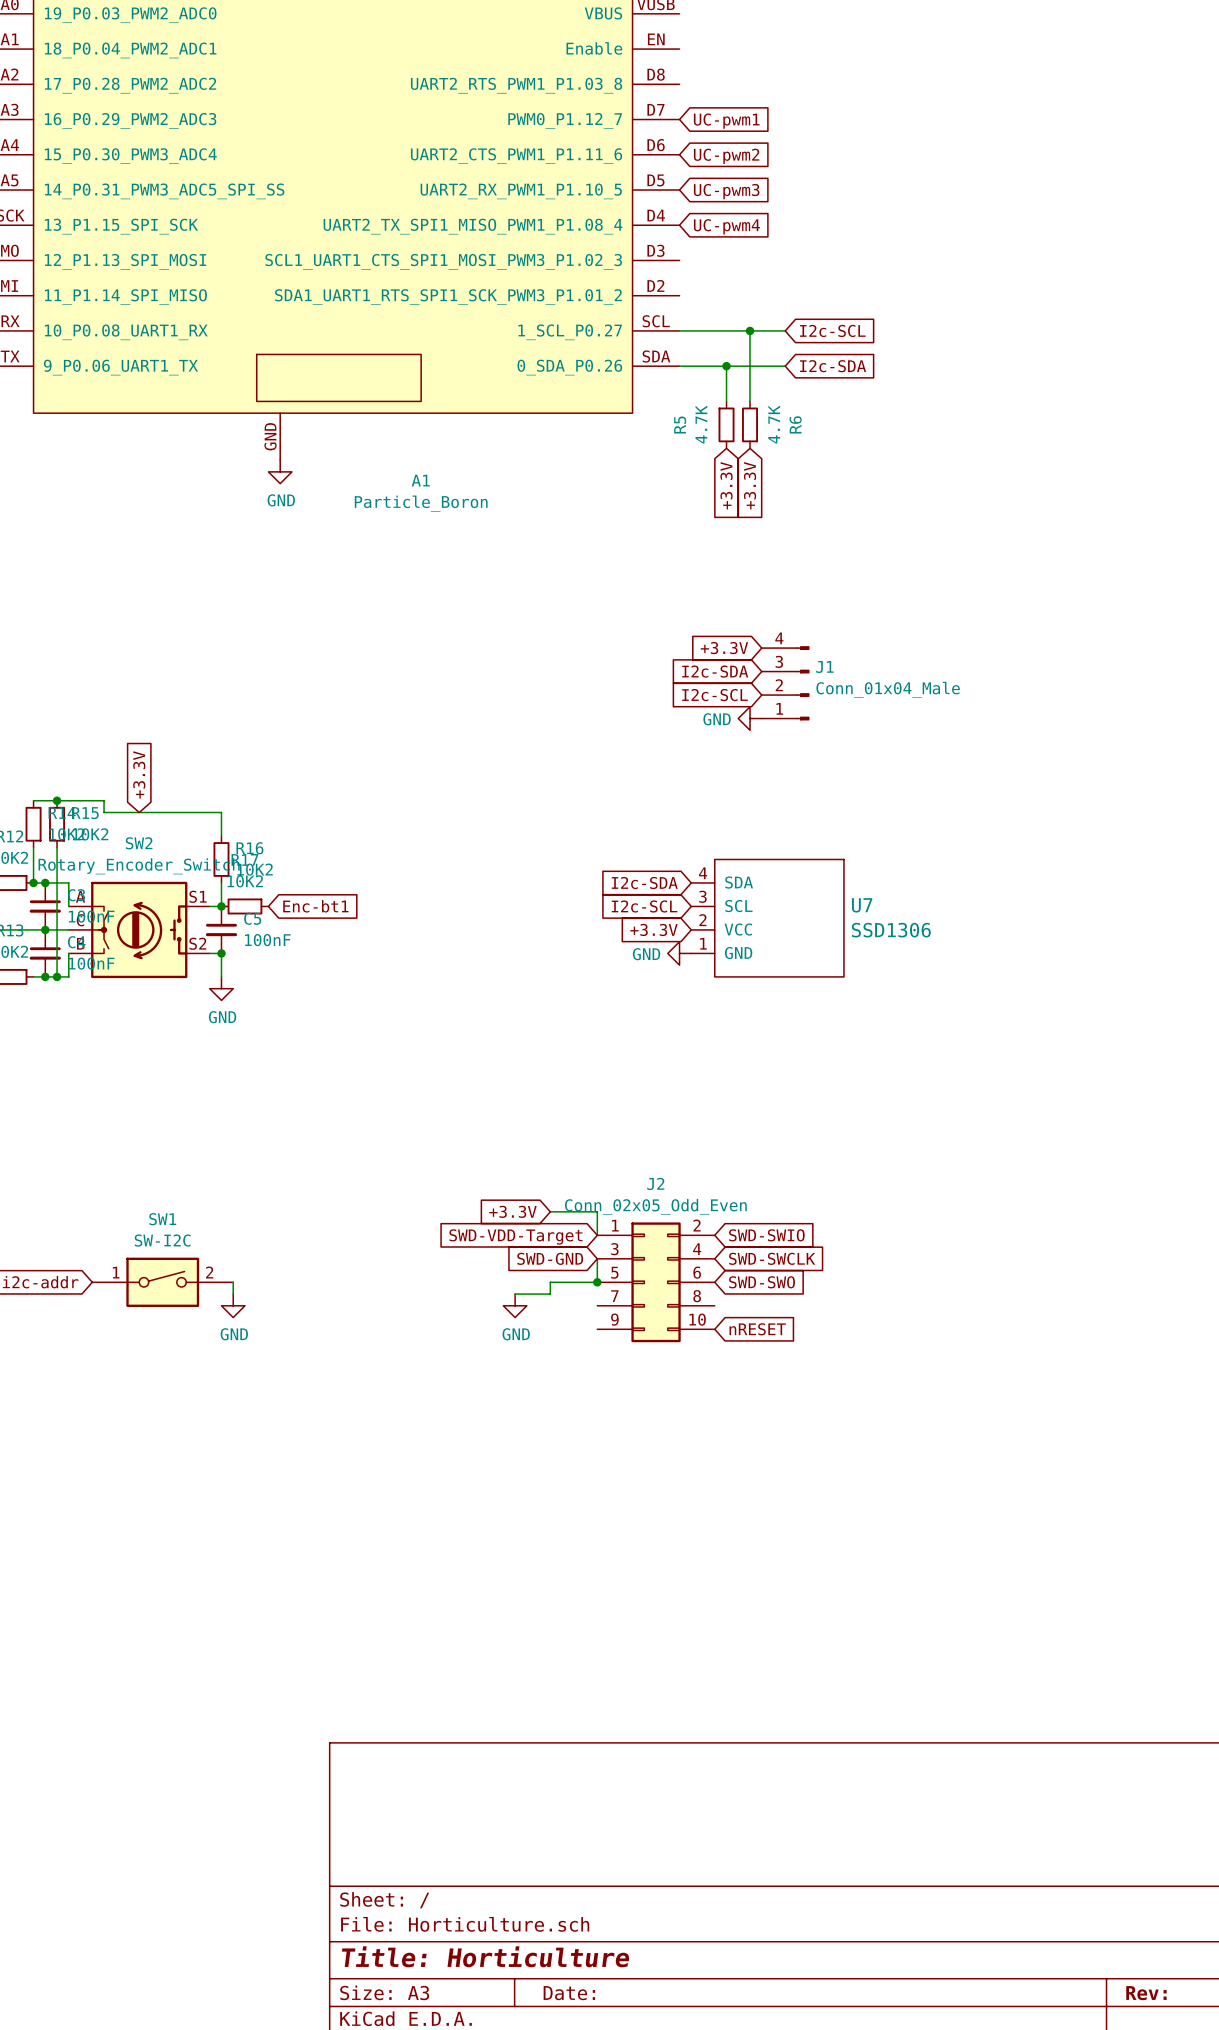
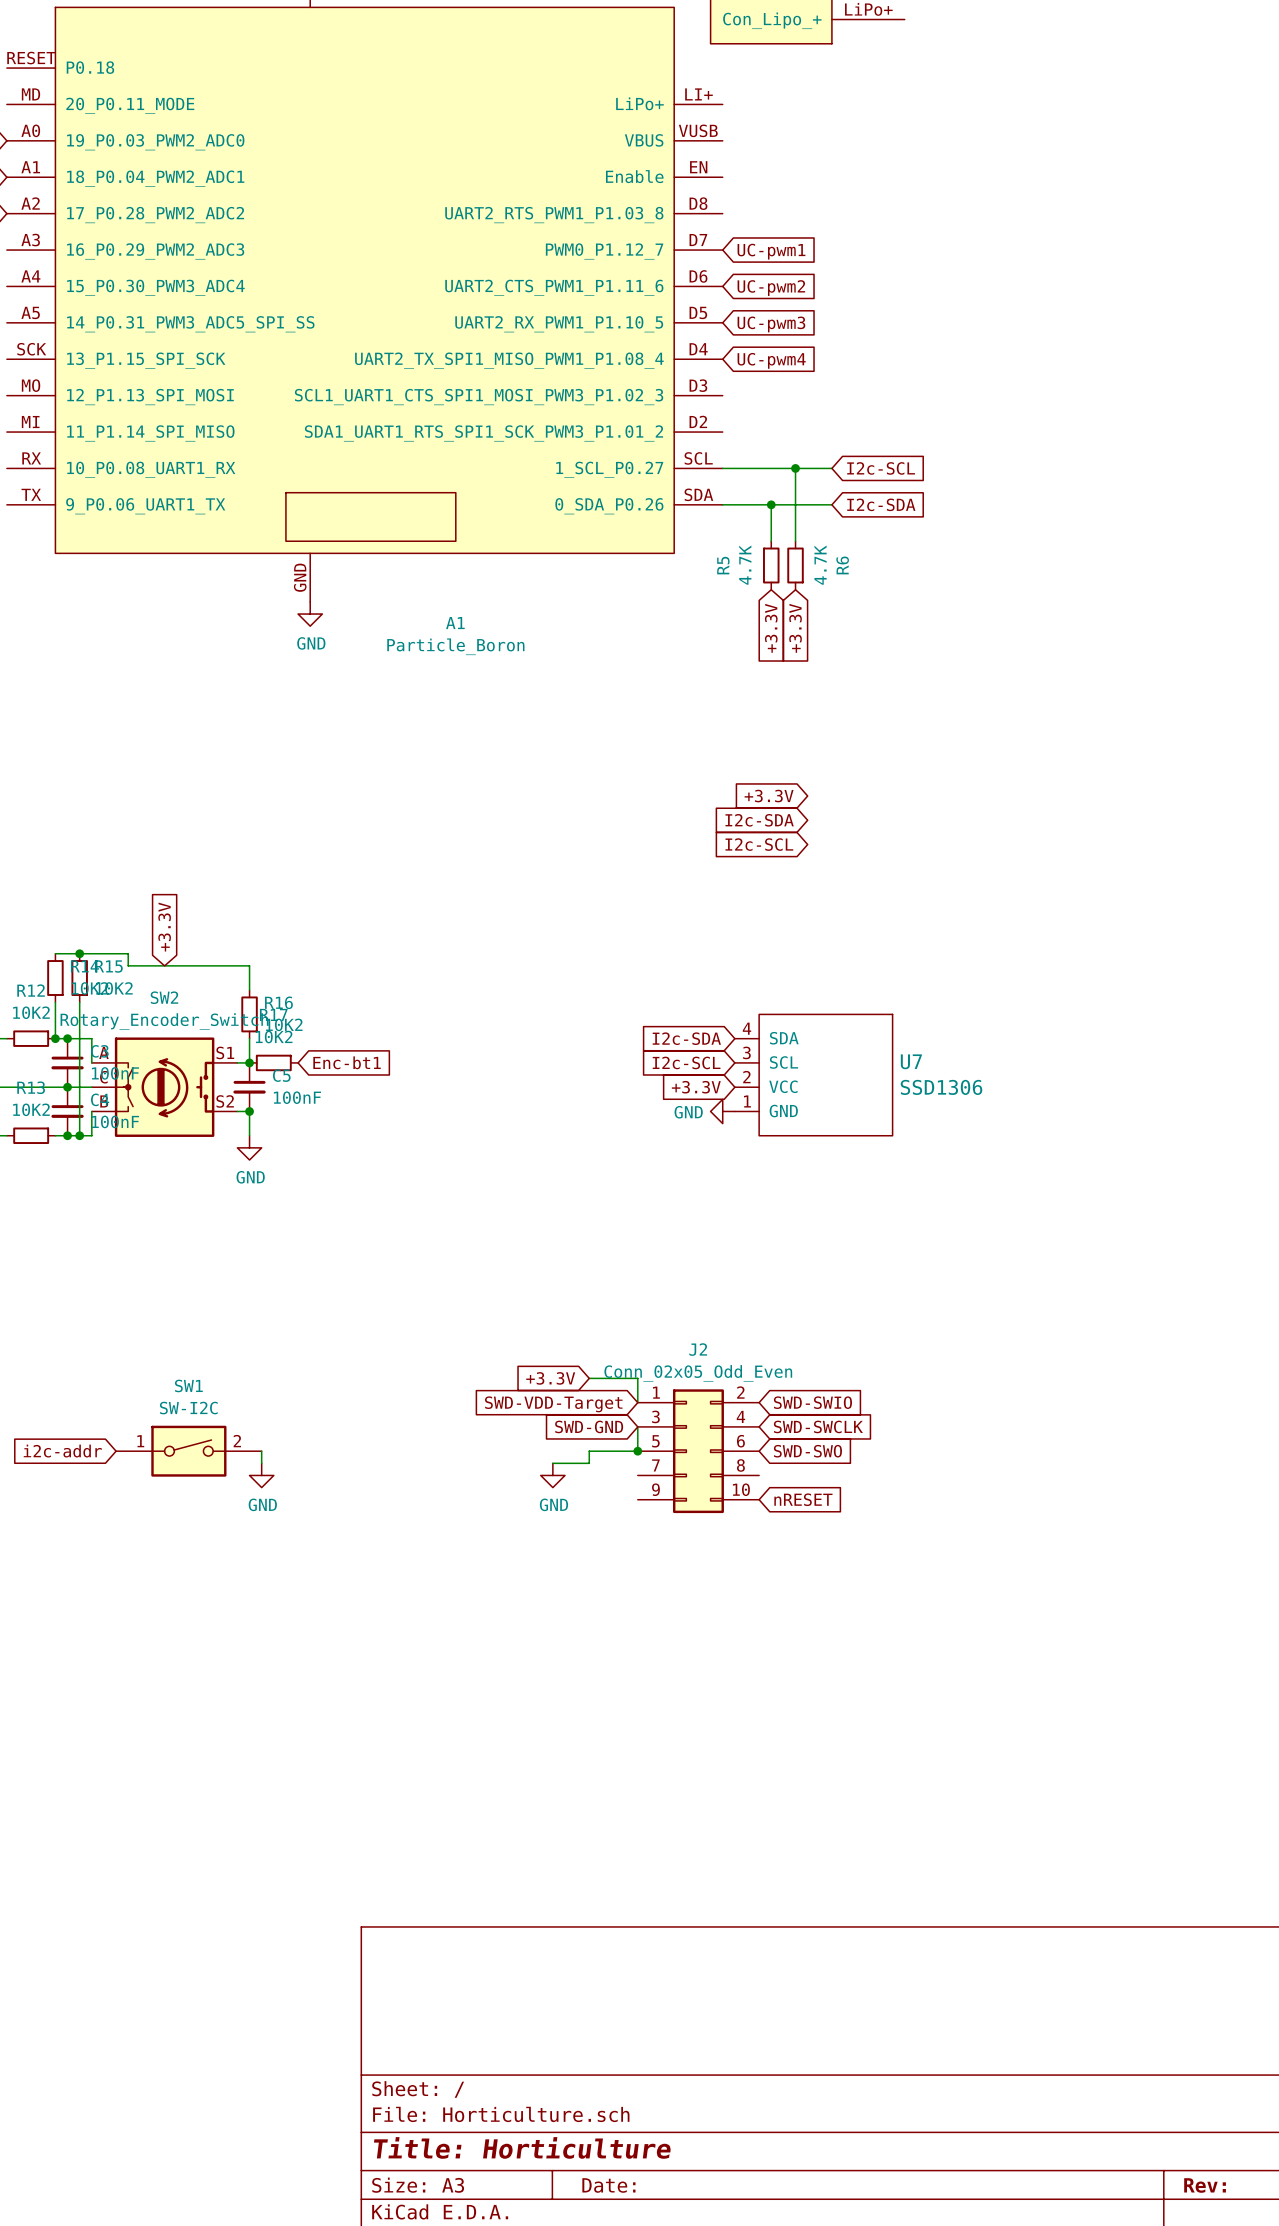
J1: Conn_01x04_Male (785, 683) -> none
power symbol: GND (750, 718) -> none

